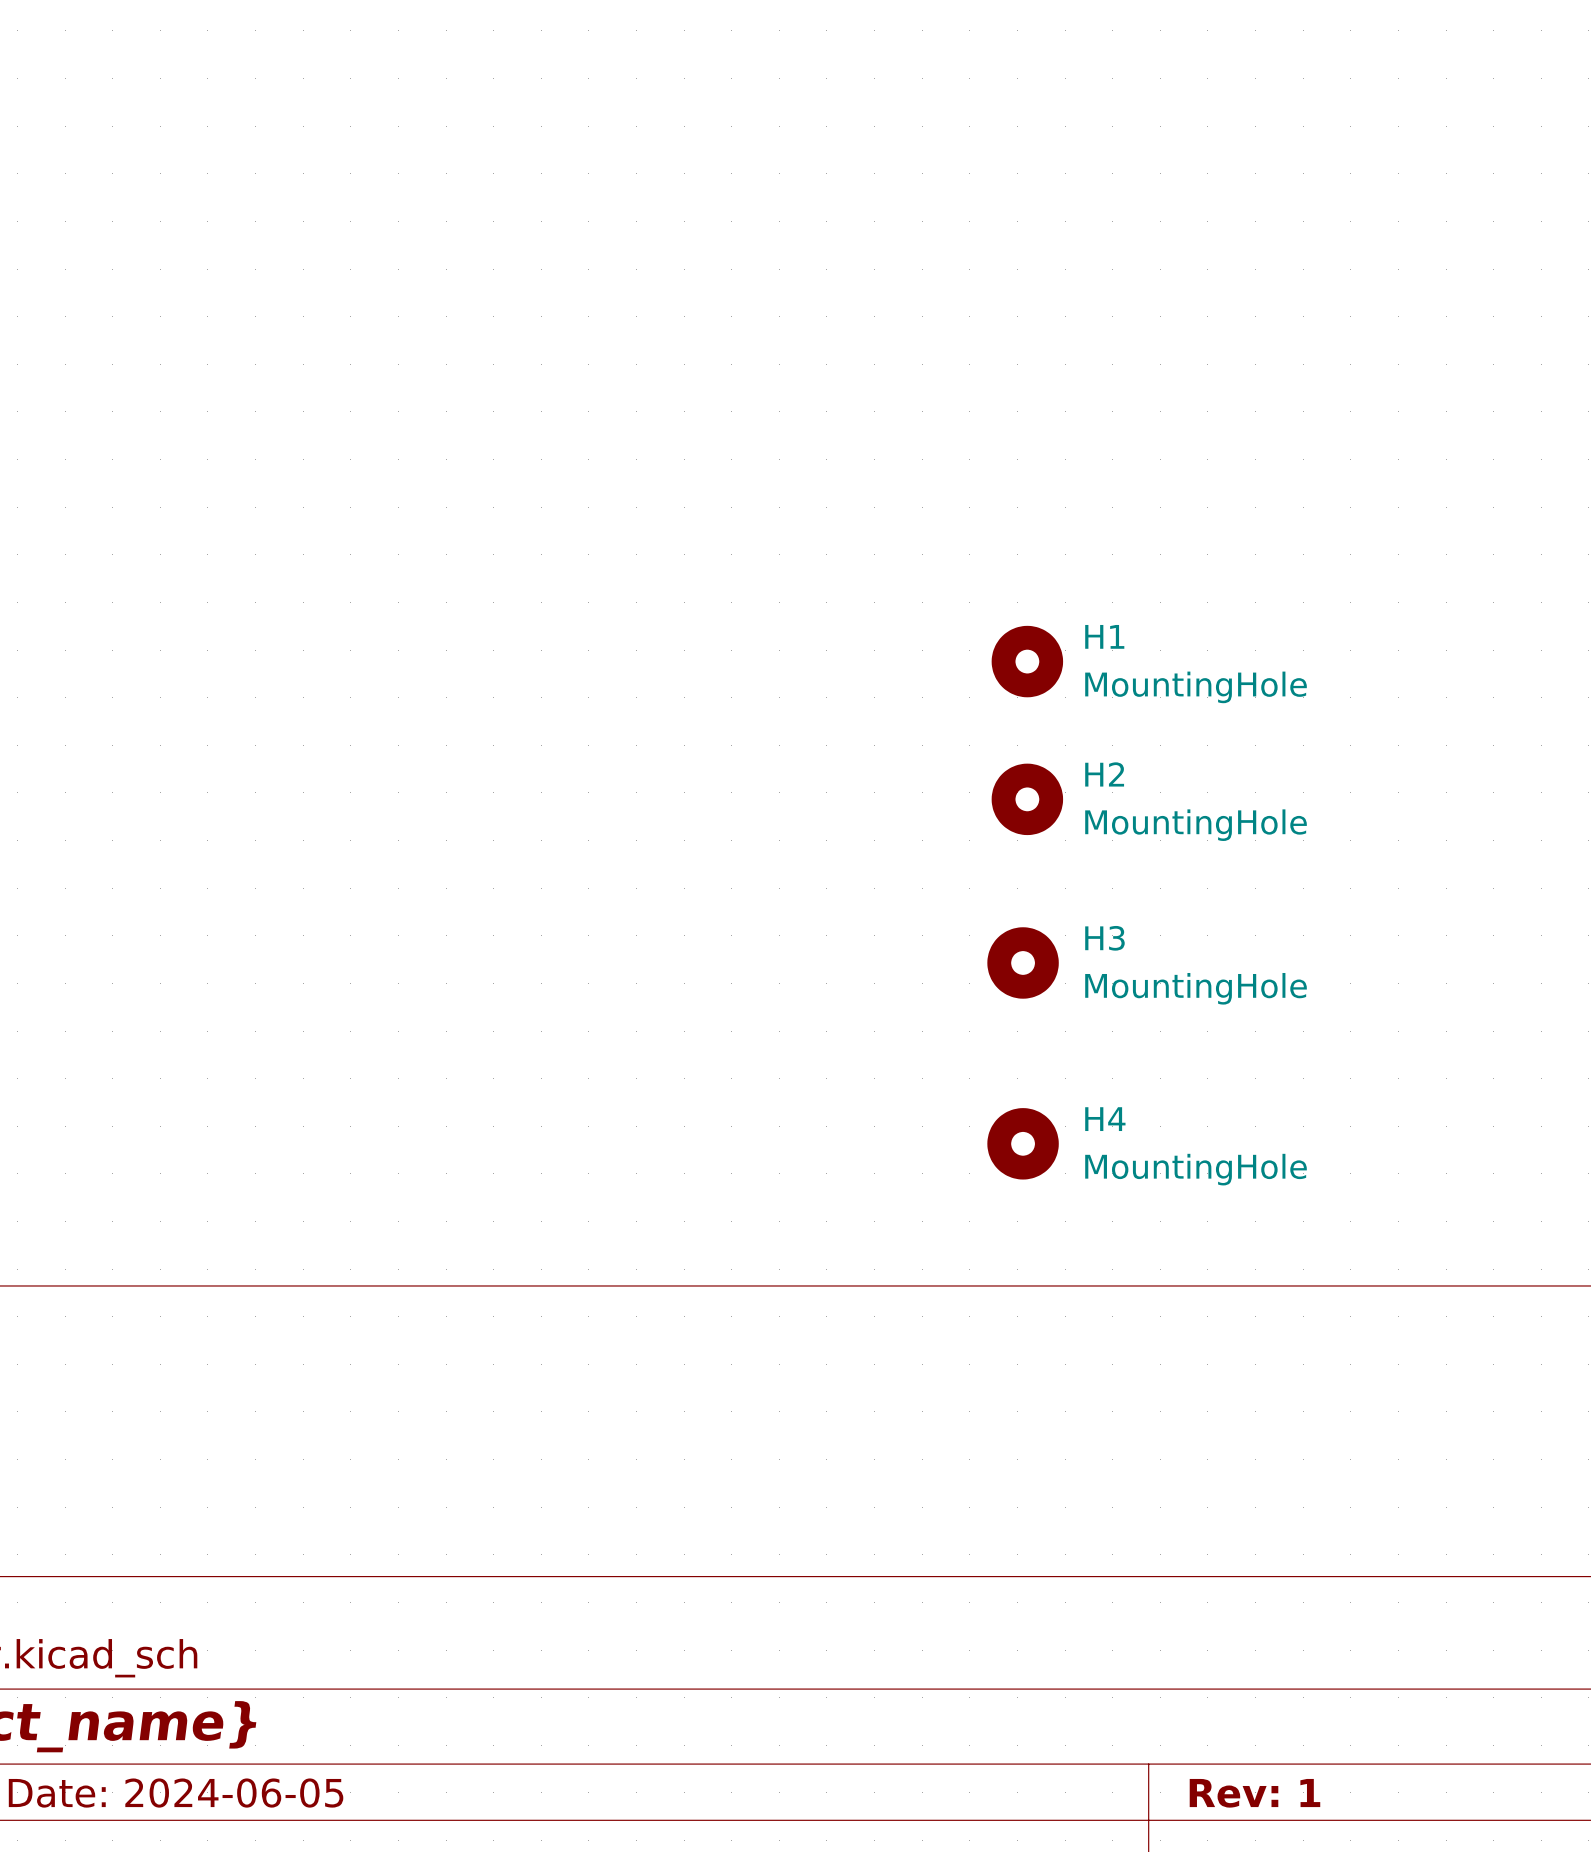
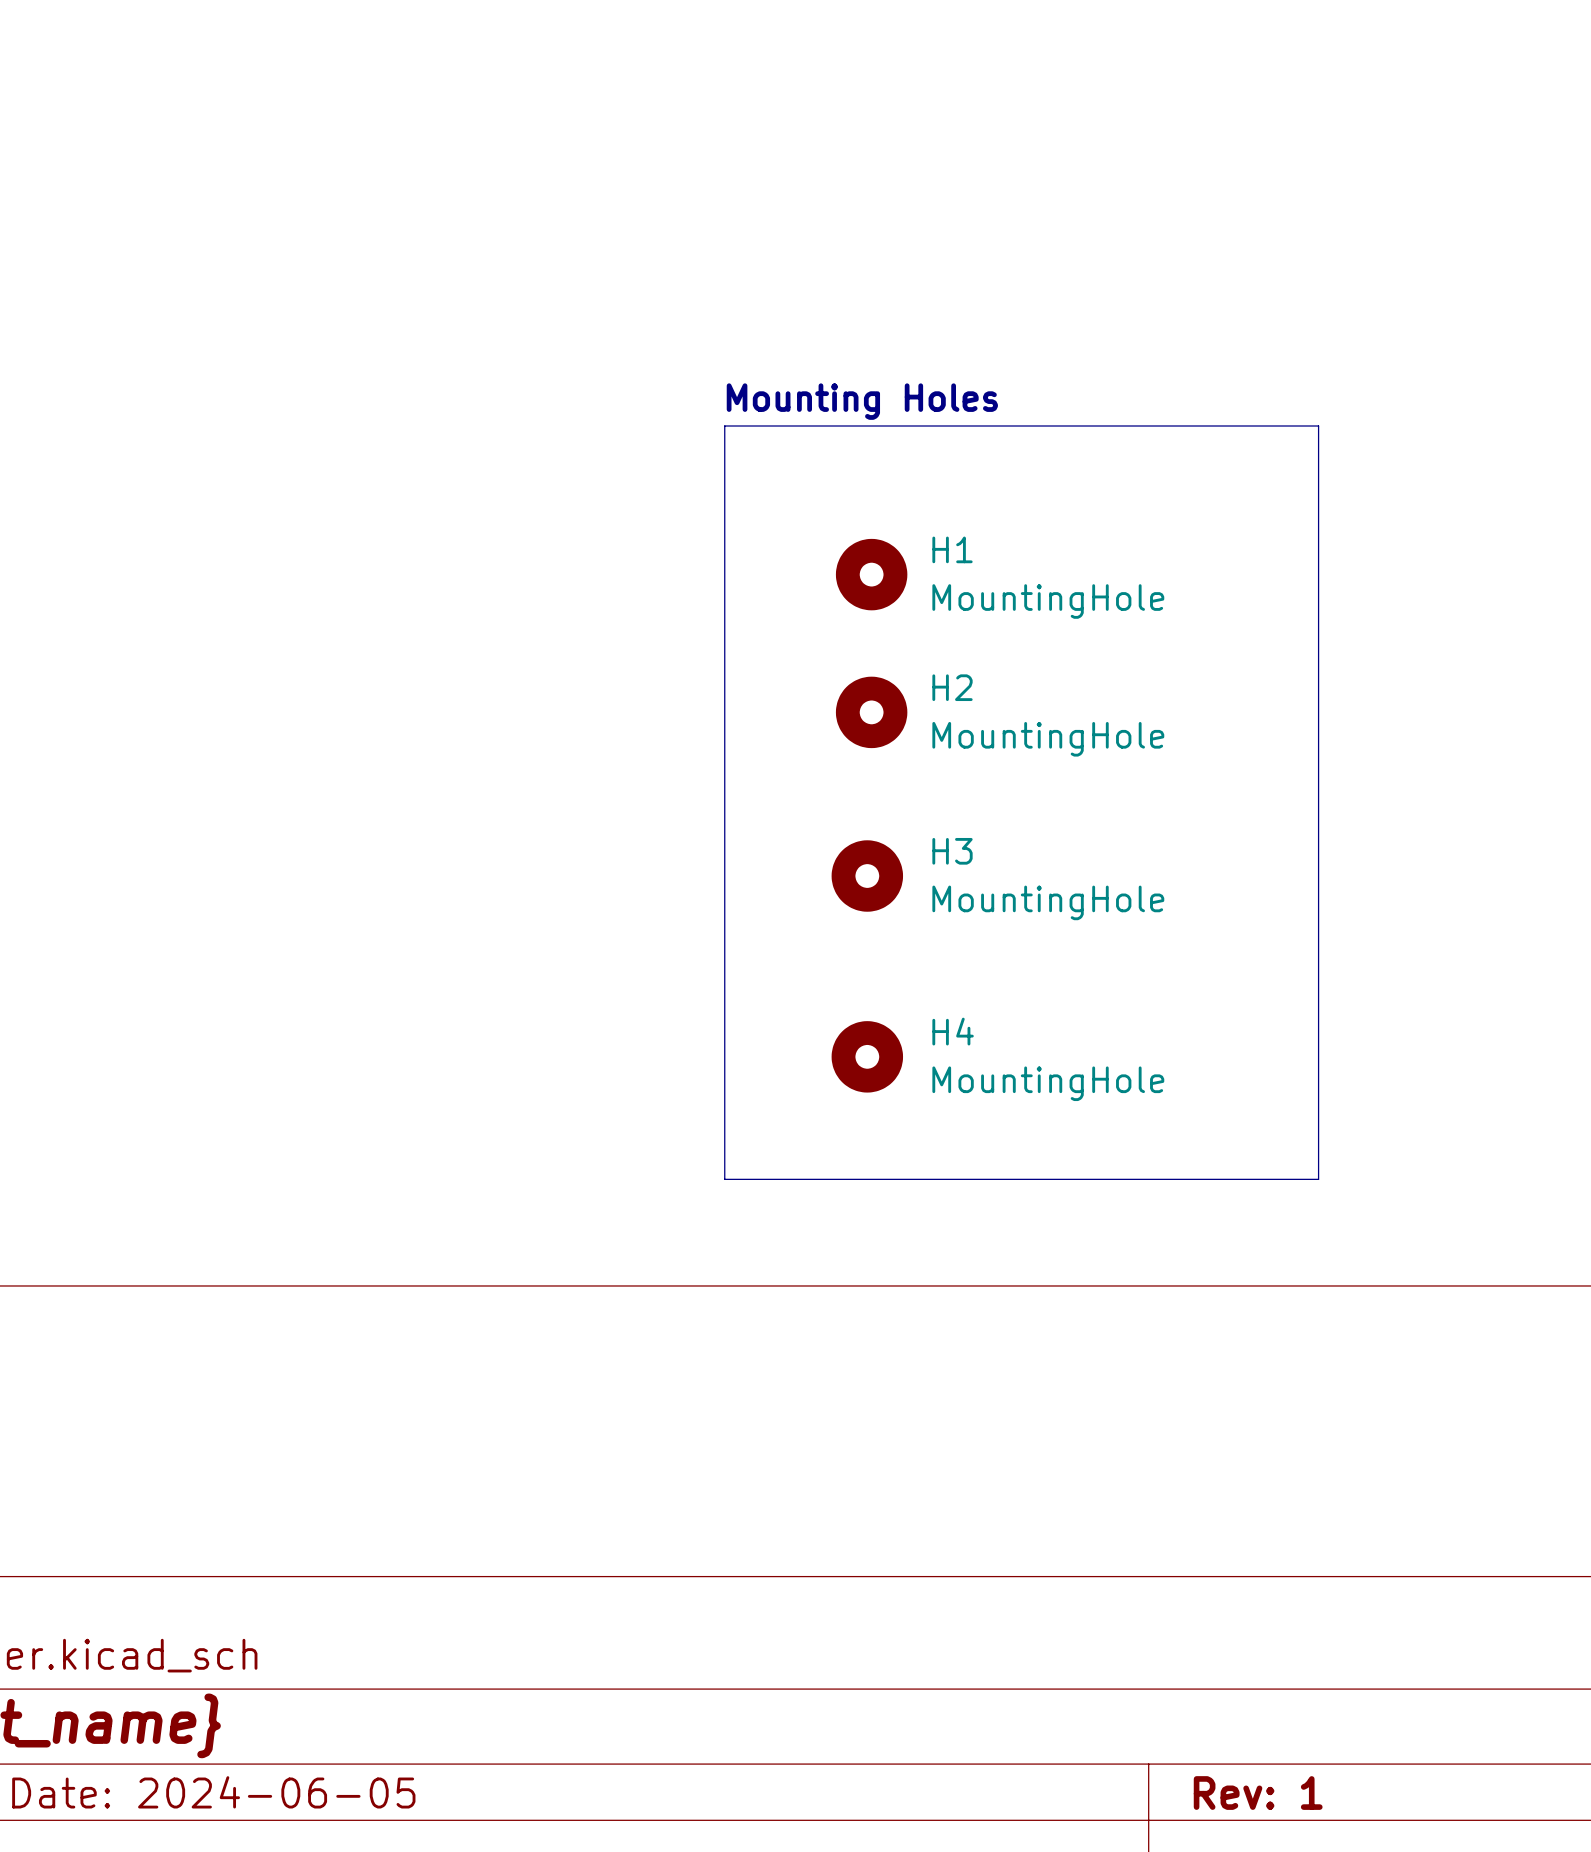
text: none -> Mounting Holes (862, 401)
line: none -> (724, 426) (1318, 426) (1318, 1179) (724, 1179) (724, 426)
H1 position: (1027, 661) -> (871, 574)
H2 position: (1027, 799) -> (871, 712)
H3 position: (1023, 962) -> (867, 876)
H4 position: (1023, 1143) -> (867, 1056)

